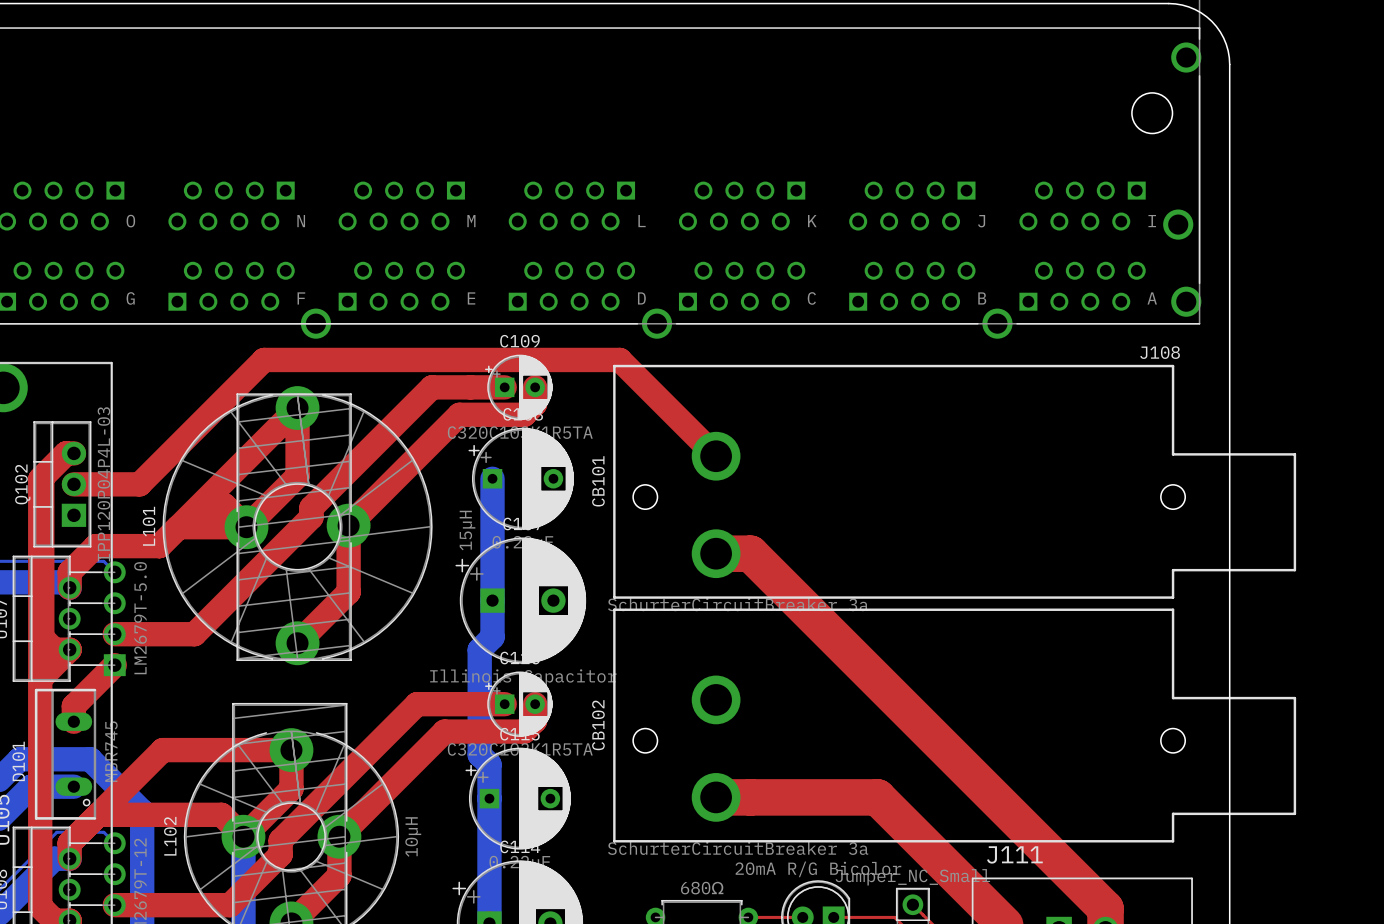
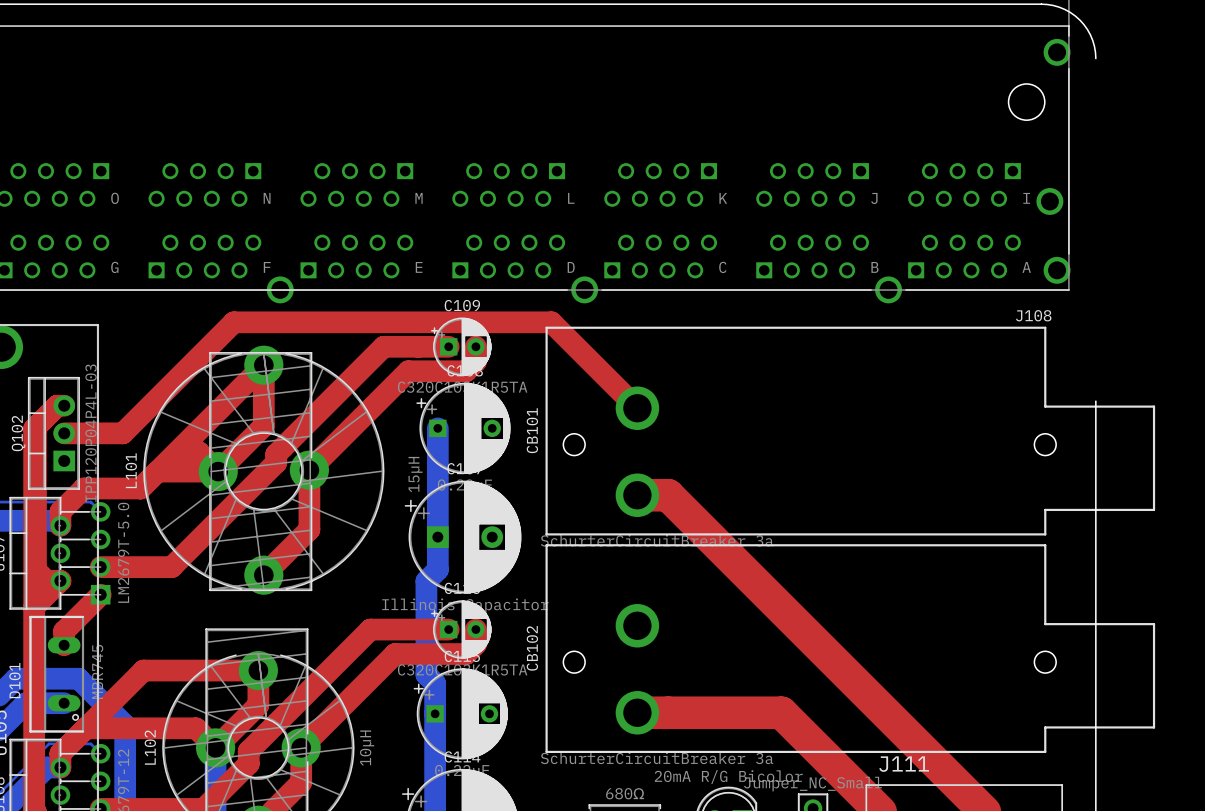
board edge: (1229, 64) (1229, 448) -> none

